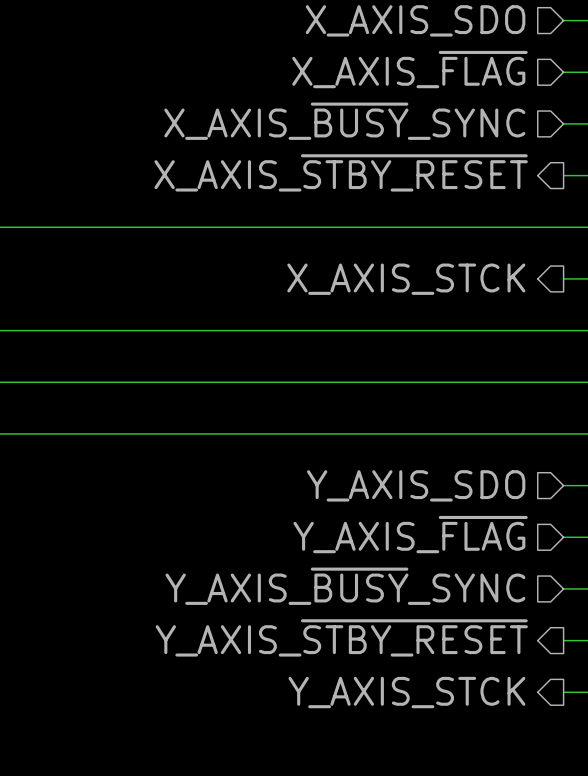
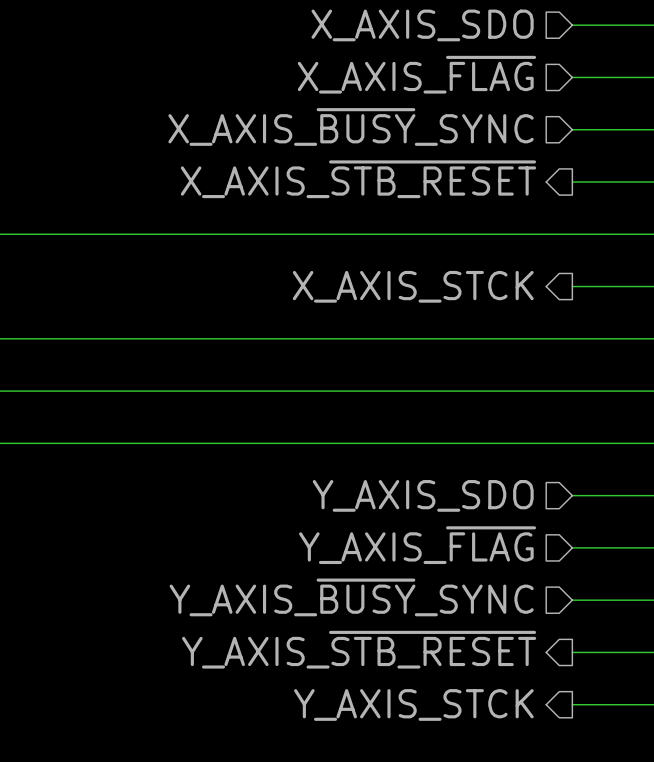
hierarchical label: X_AXIS_~{STBY_RESET} (341, 172) -> X_AXIS_~{STB_RESET} (358, 179)
hierarchical label: Y_AXIS_~{STBY_RESET} (341, 637) -> Y_AXIS_~{STB_RESET} (359, 649)

